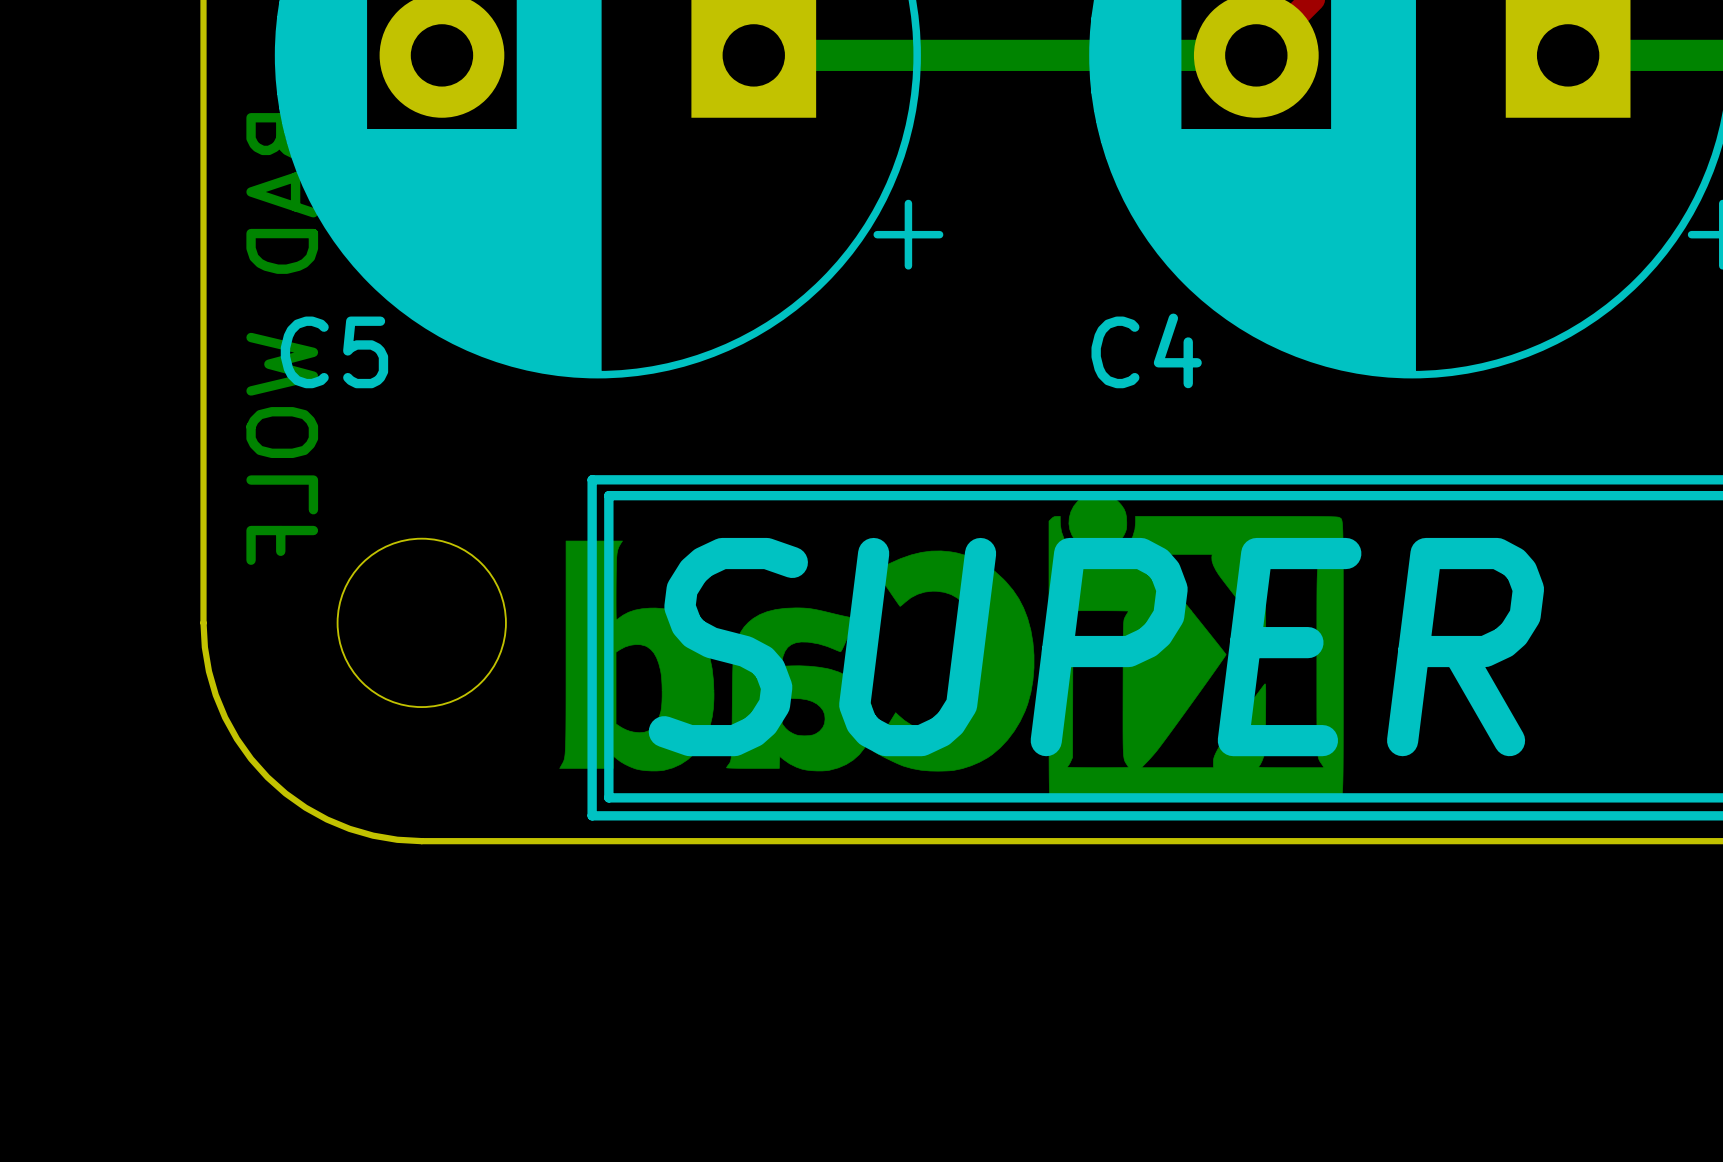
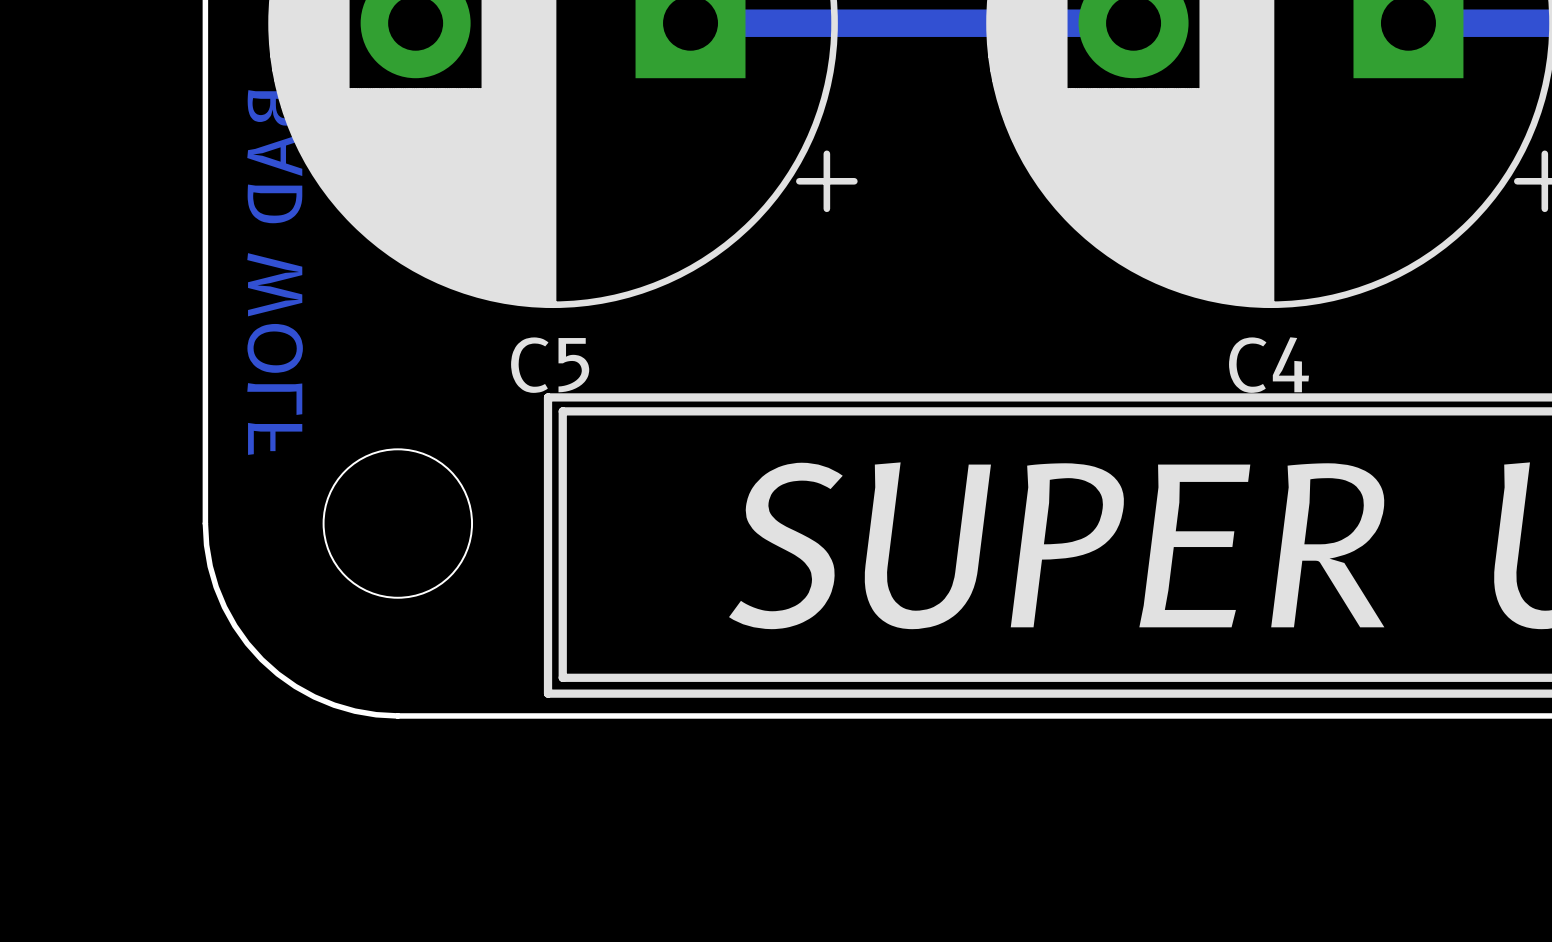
C4 name position: C4 (1146, 350) -> C4 (1269, 365)
C5 name position: C5 (334, 352) -> C5 (550, 365)
drawing: [559, 493, 1344, 801] -> none

